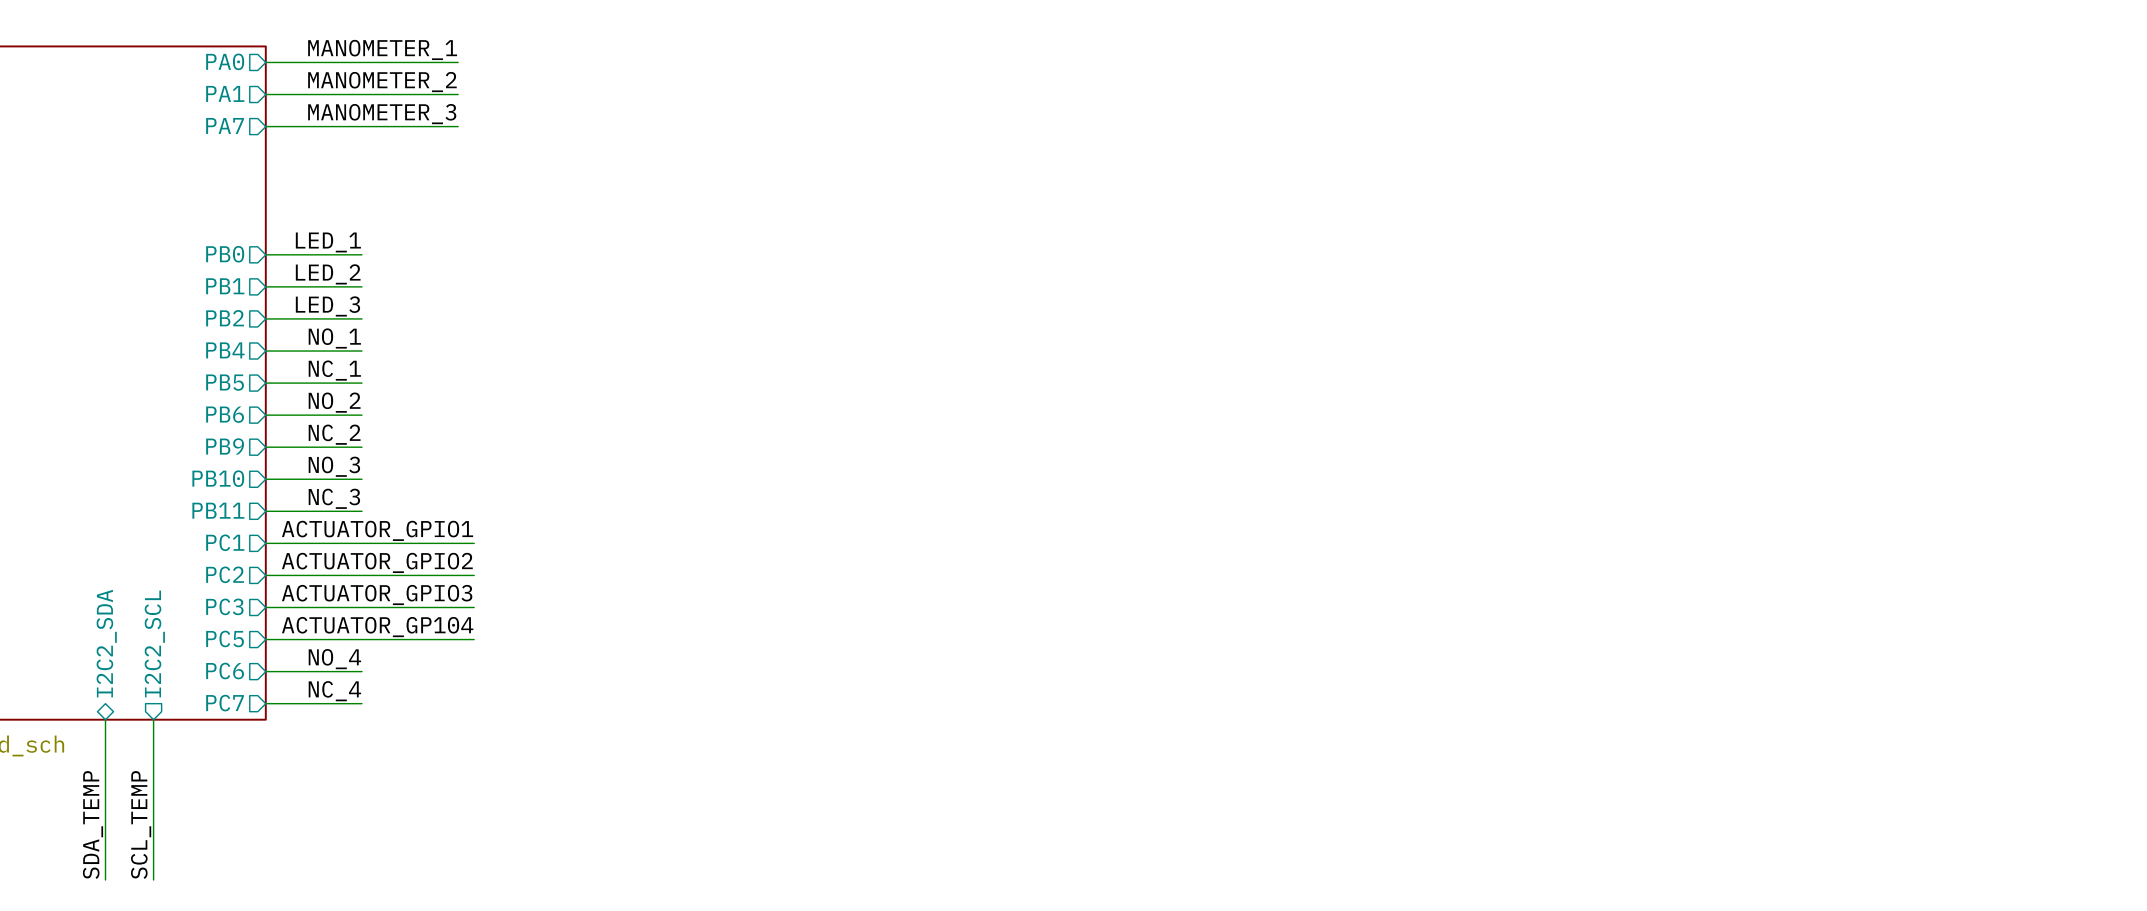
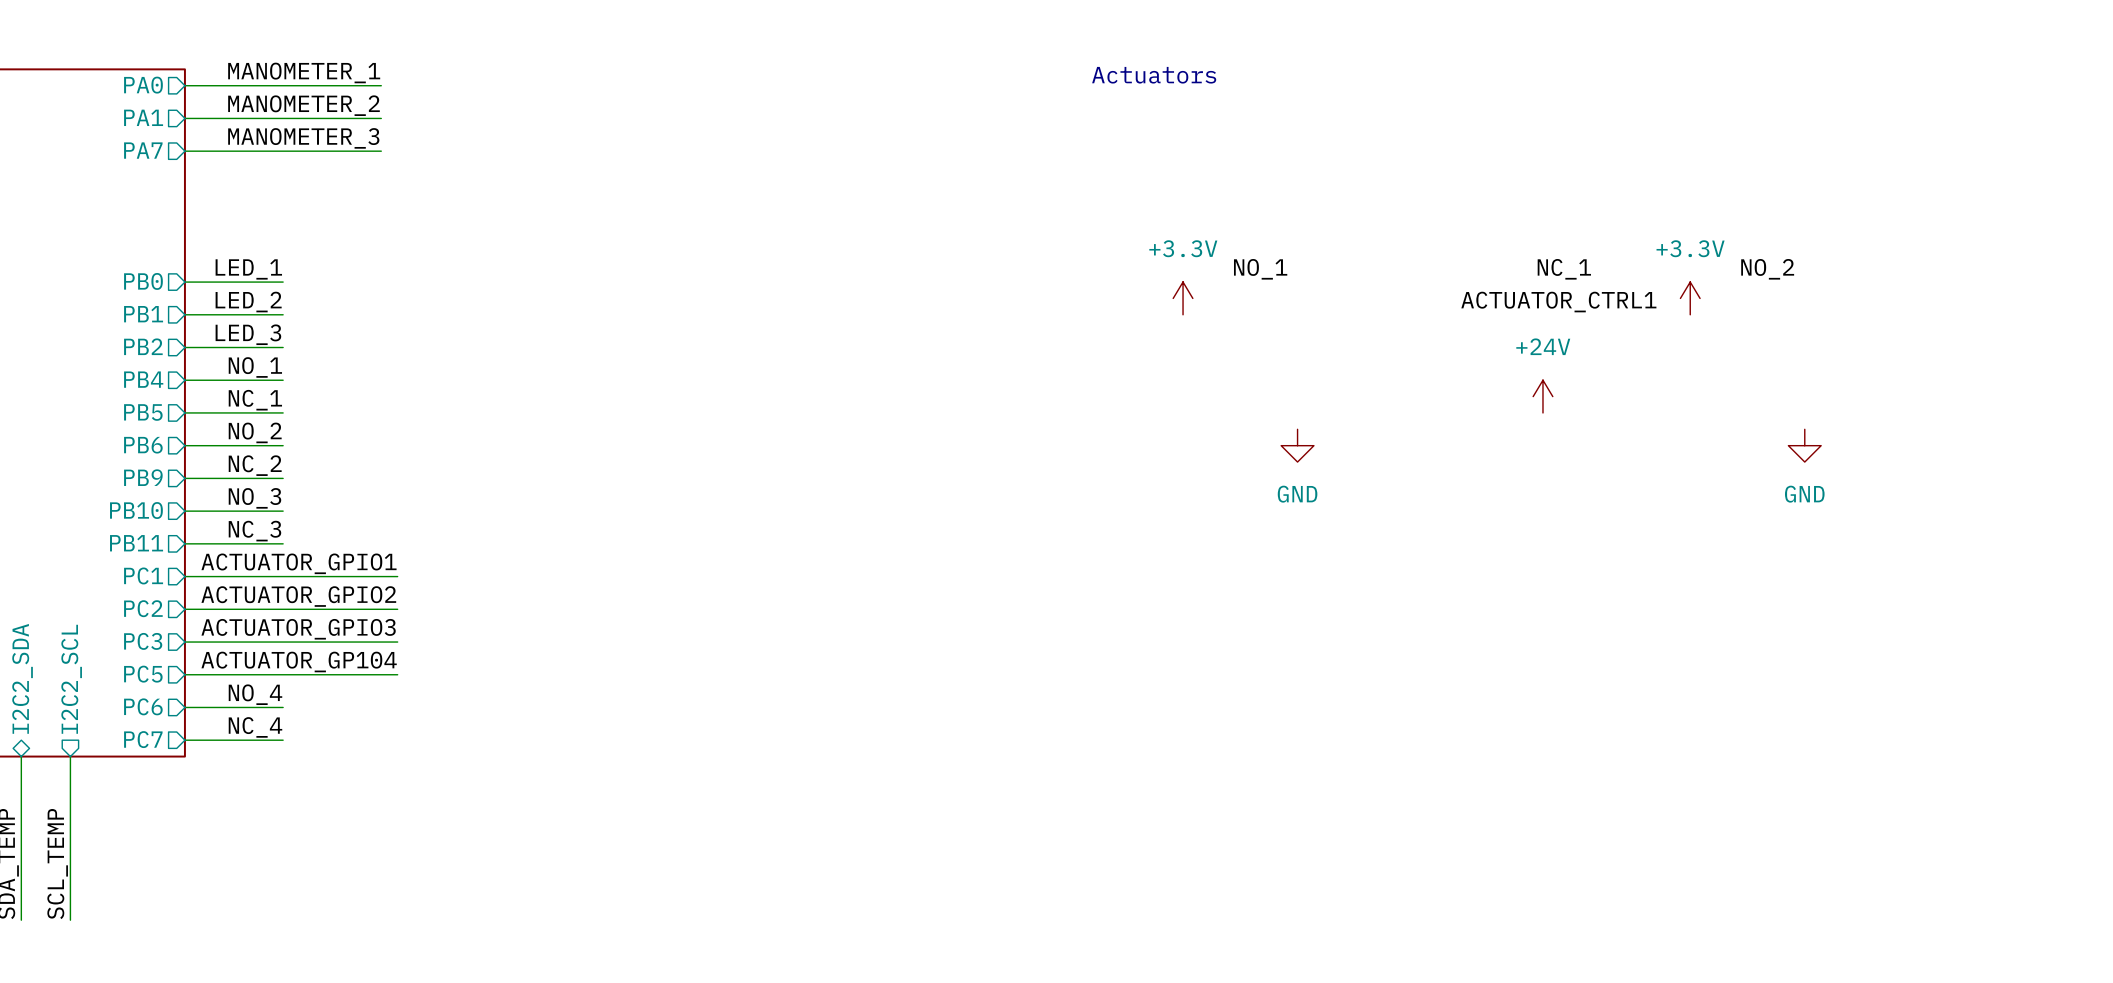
text: none -> Actuators (1154, 75)
label: none -> NO_1 (1260, 269)
label: none -> NC_1 (1564, 269)
label: none -> NO_2 (1767, 269)
power symbol: none -> +3.3V (1183, 298)
power symbol: none -> +3.3V (1690, 298)
label: none -> ACTUATOR_CTRL1 (1558, 302)
power symbol: none -> +24V (1542, 396)
power symbol: none -> GND (1297, 445)
power symbol: none -> GND (1804, 445)

